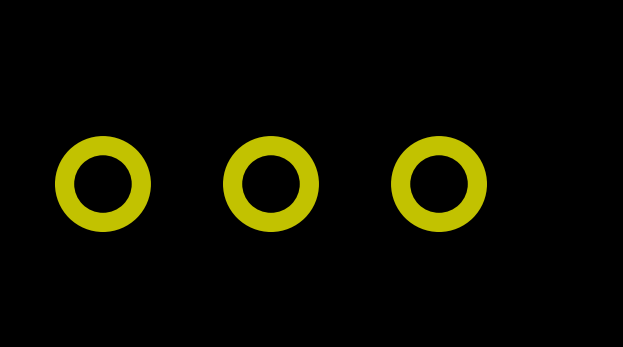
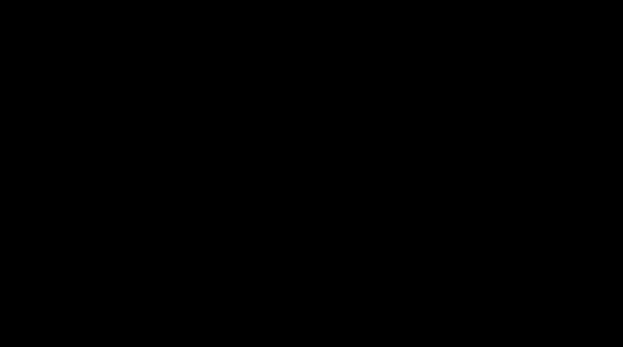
part: (270, 184) -> none

